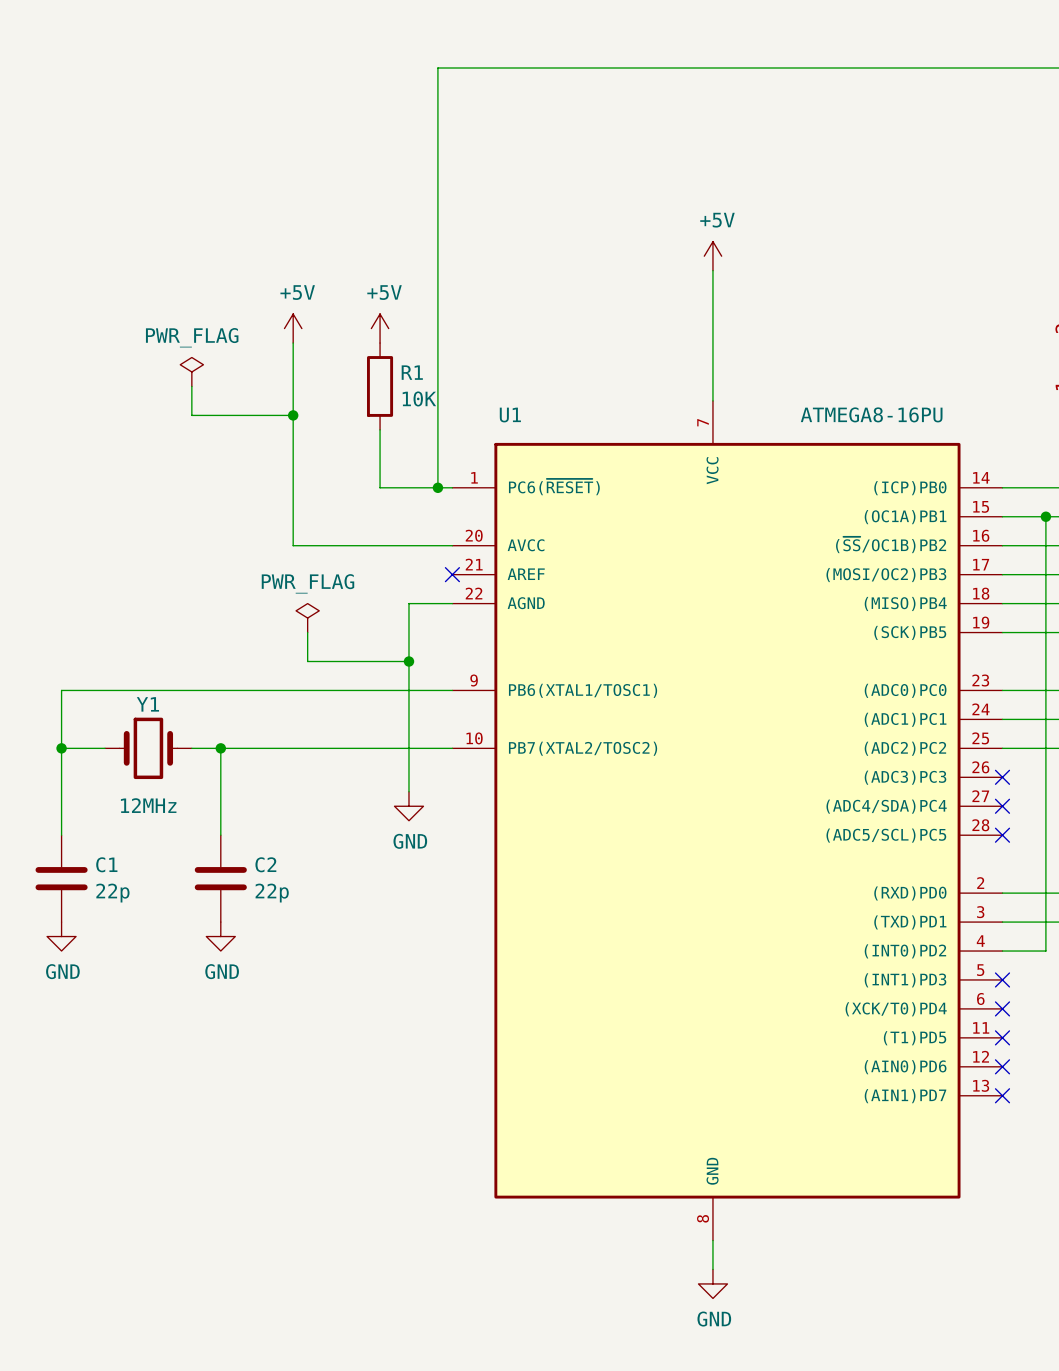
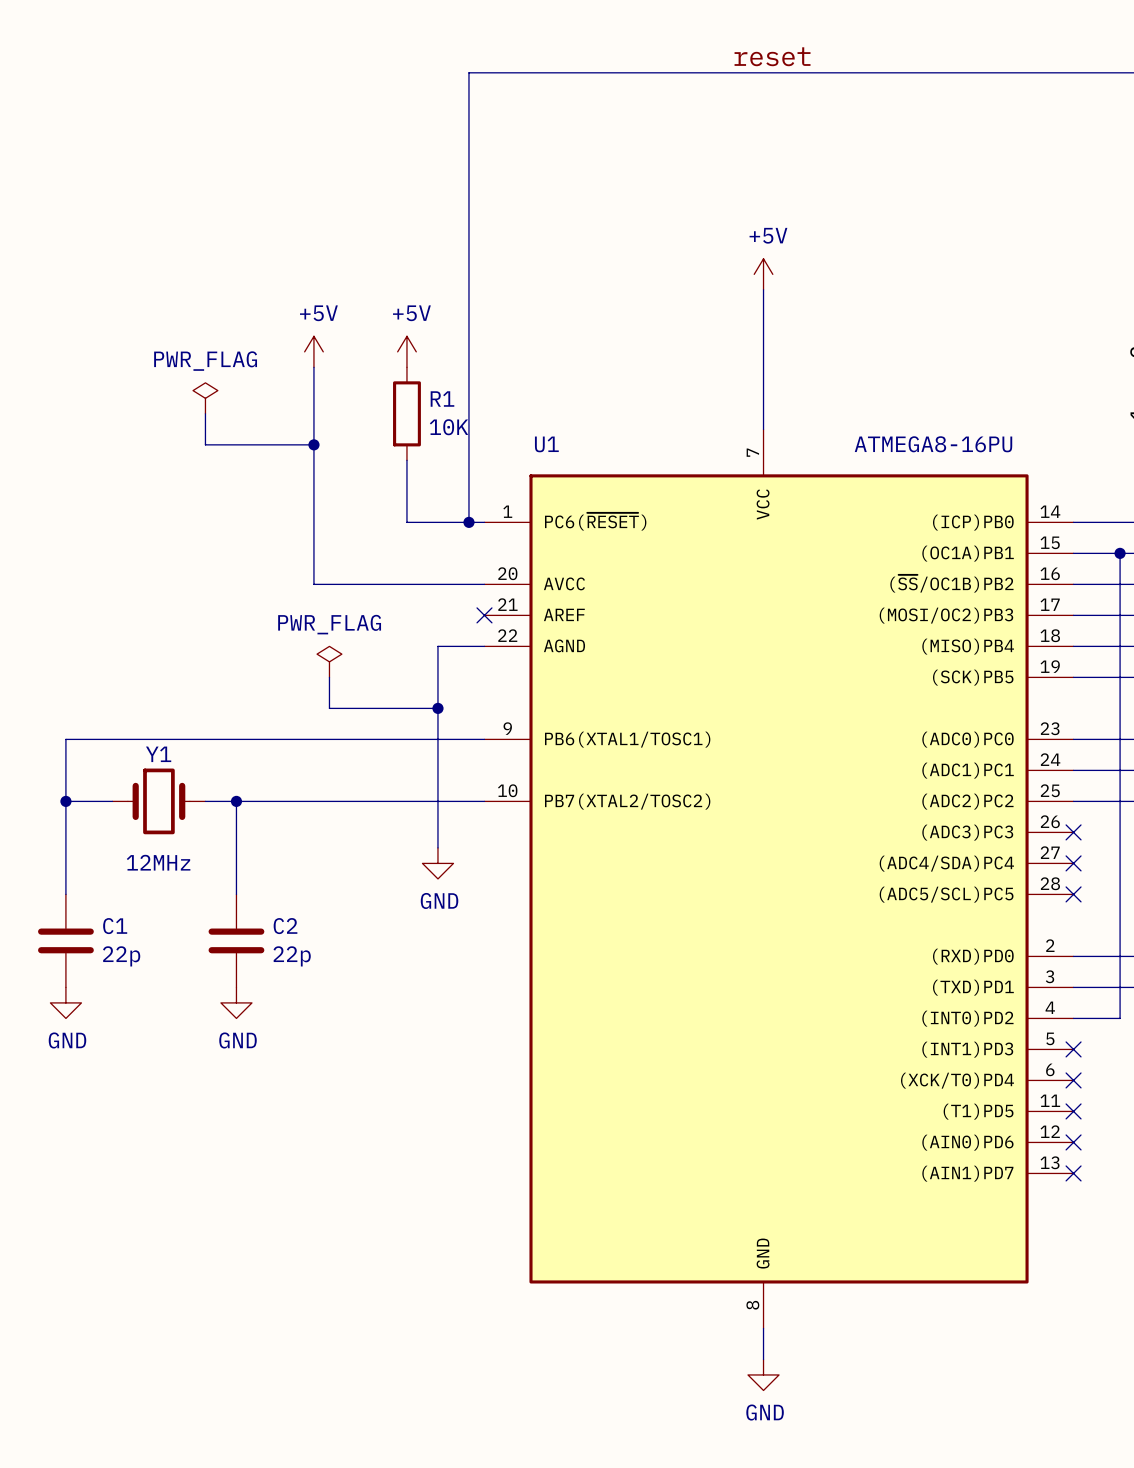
label: none -> reset (772, 56)

